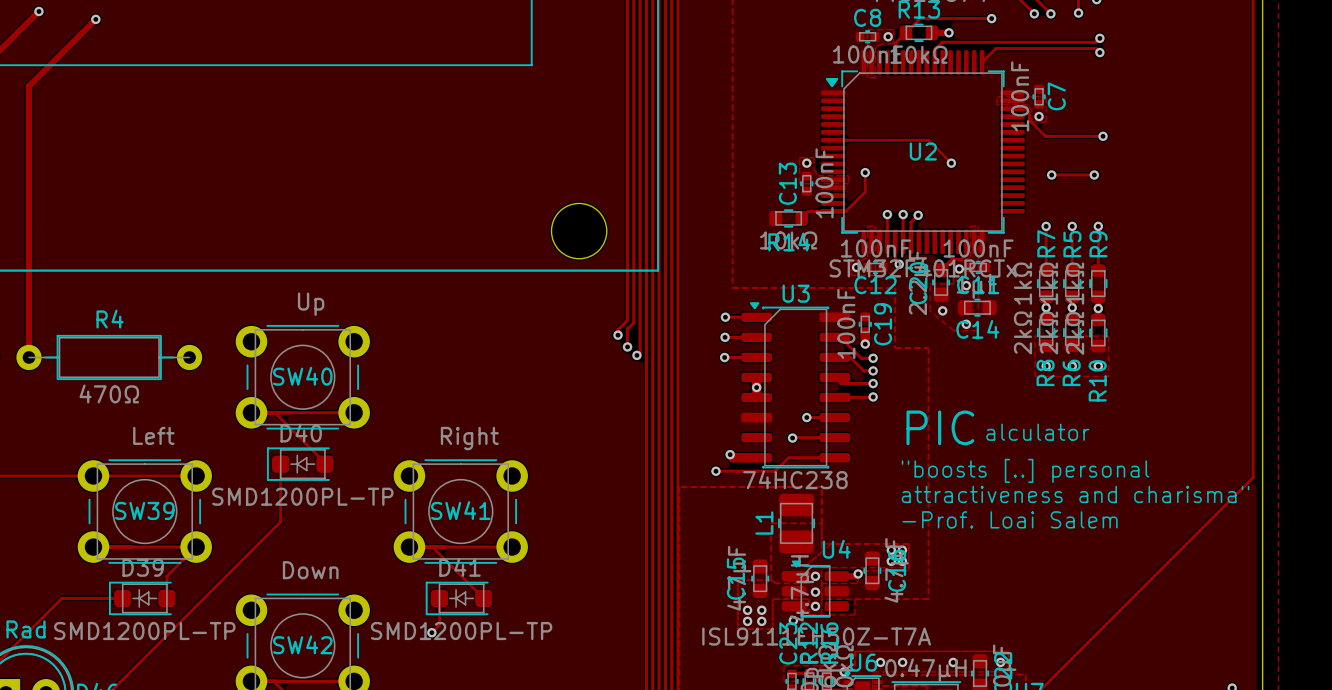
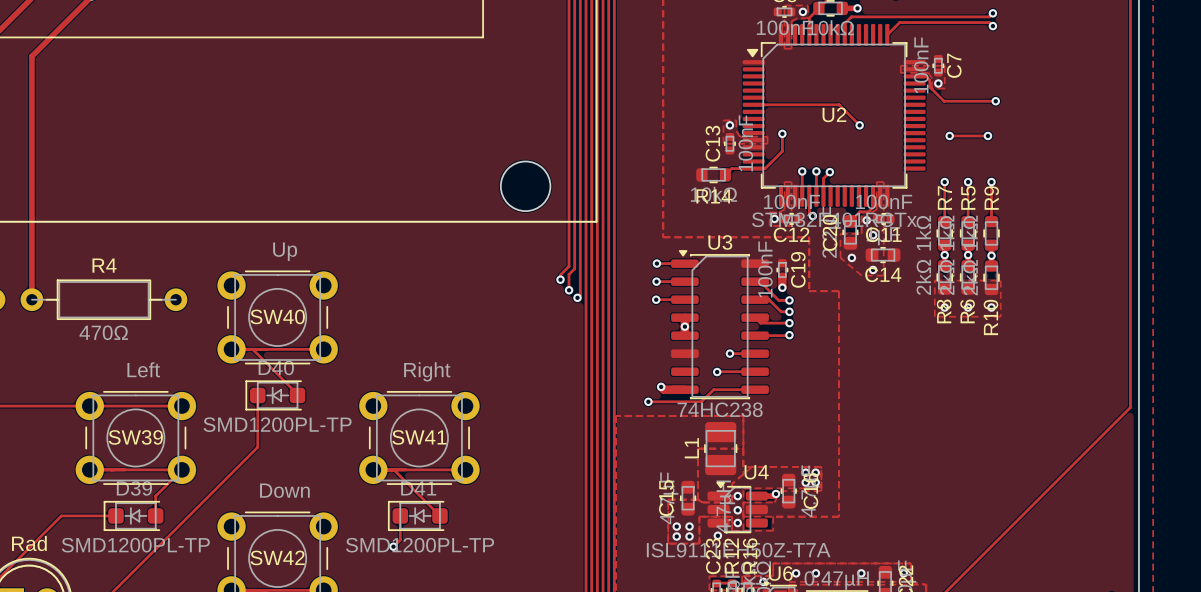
text: PIC (940, 427) -> none
text: alculator (1037, 432) -> none
text: "boosts [..] personal (1025, 470) -> none
text: attractiveness and charisma" (1075, 494) -> none
text: -Prof. Loai Salem (1010, 519) -> none

